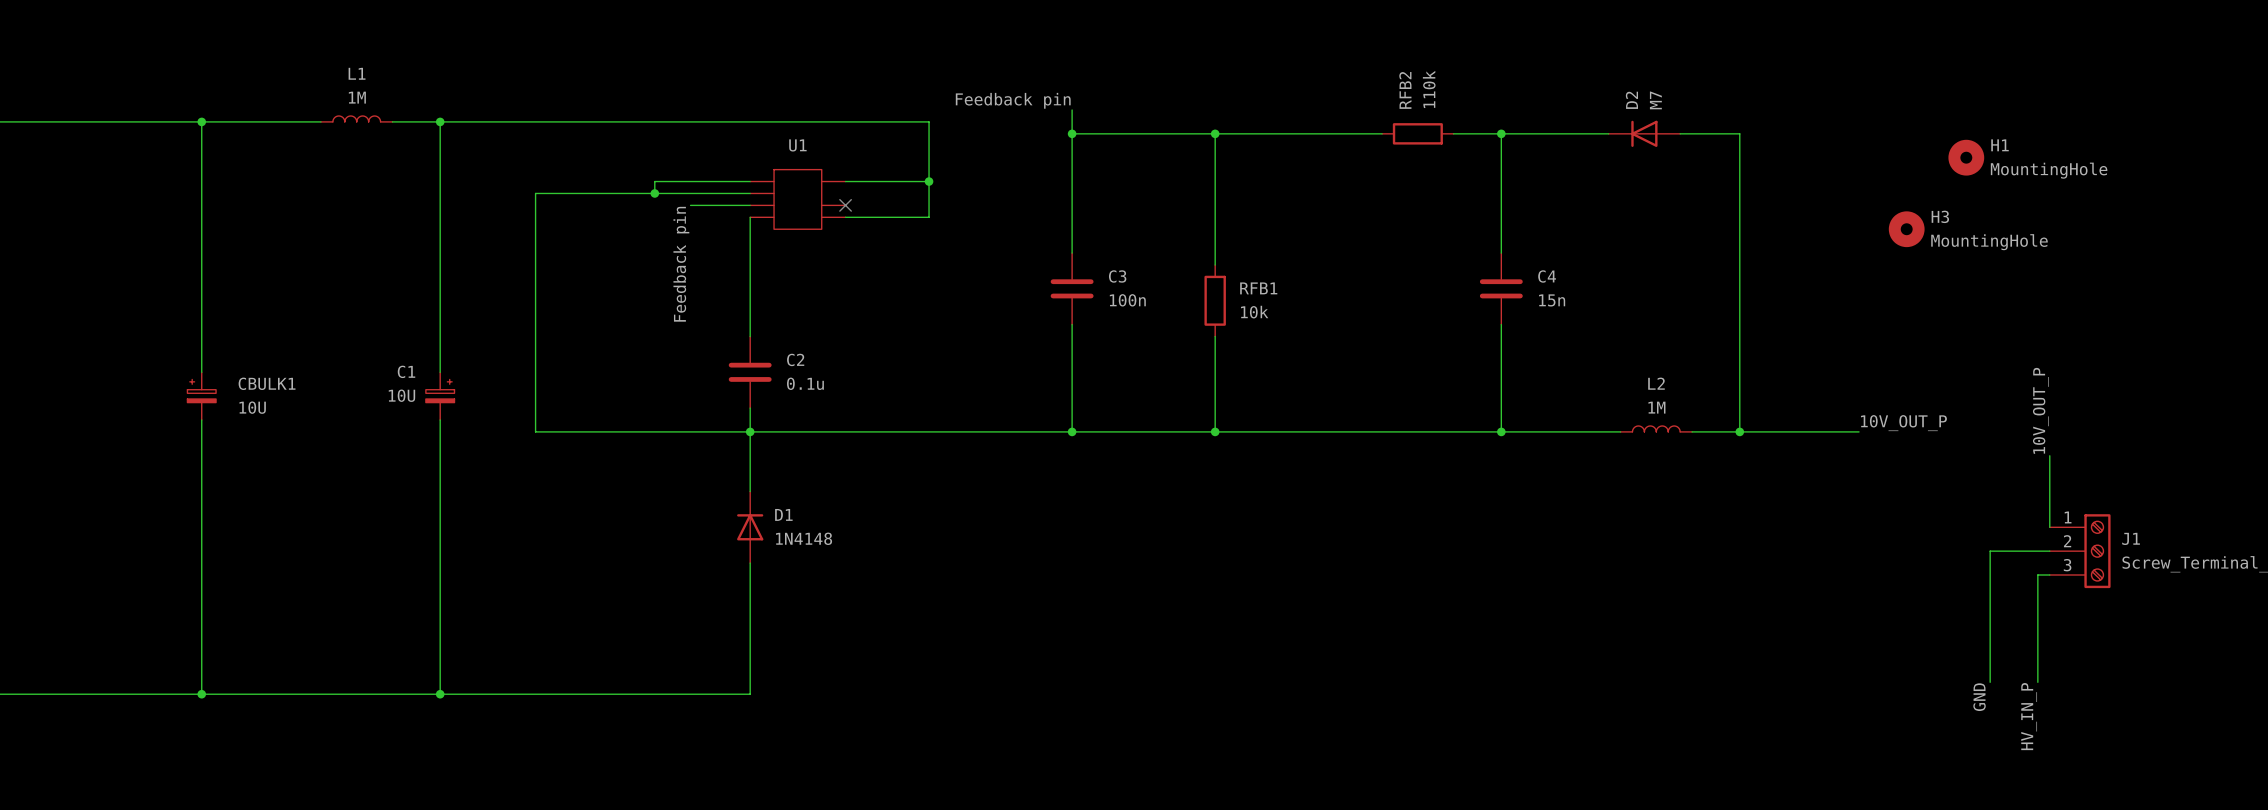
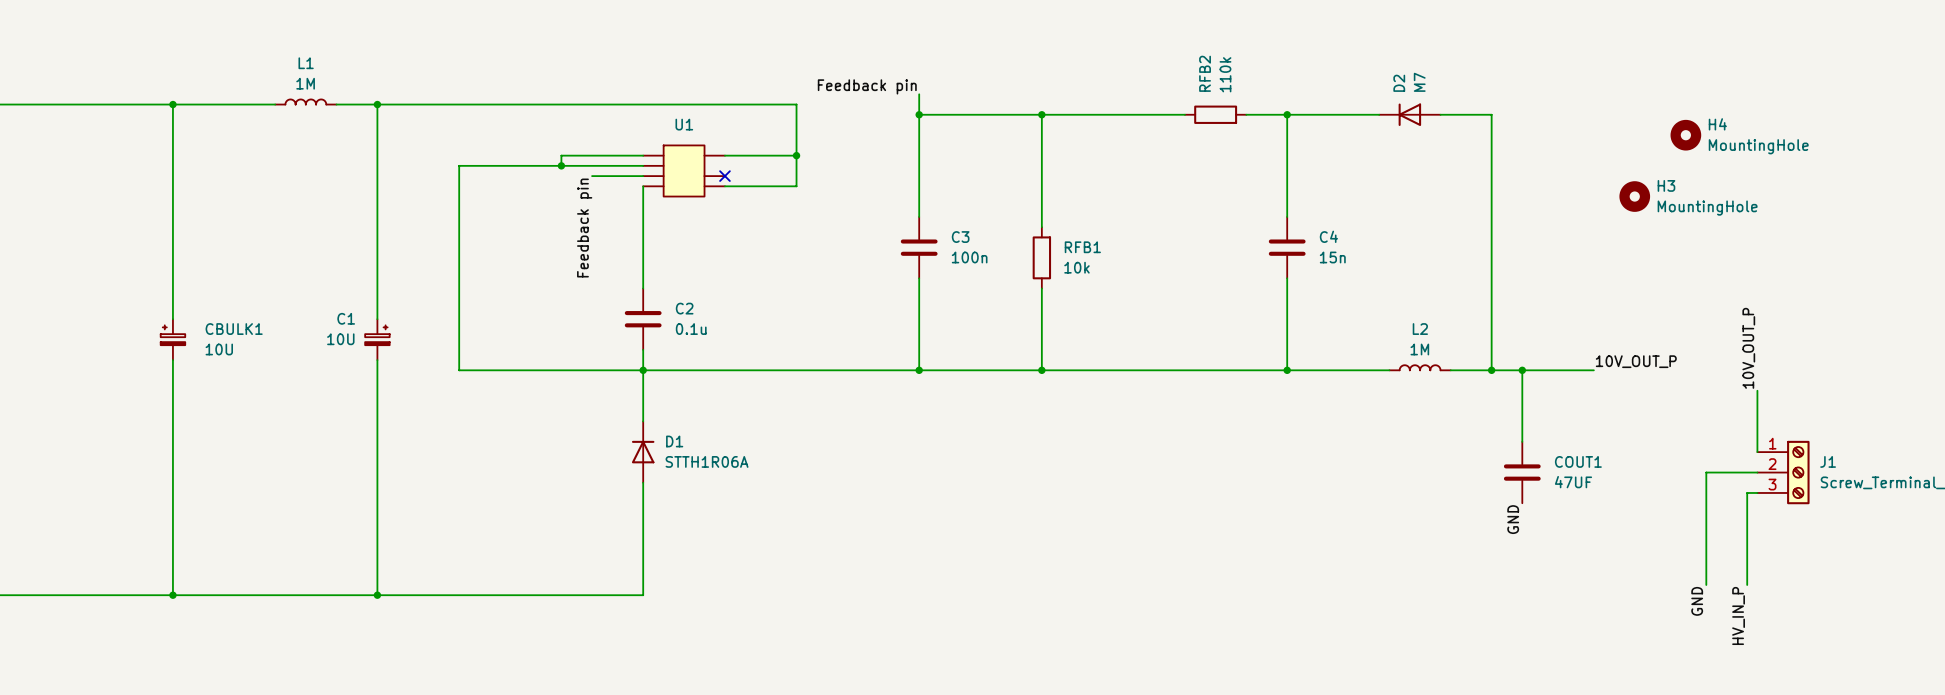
H1 name: H1 (2000, 145) -> H4 (1717, 124)
wire: none -> (1522, 370) (1522, 441)
junction: none -> (1522, 370)
D1 value: 1N4148 (804, 538) -> STTH1R06A (707, 461)
COUT1: none -> 47UF (1522, 472)
label: none -> GND (1513, 519)

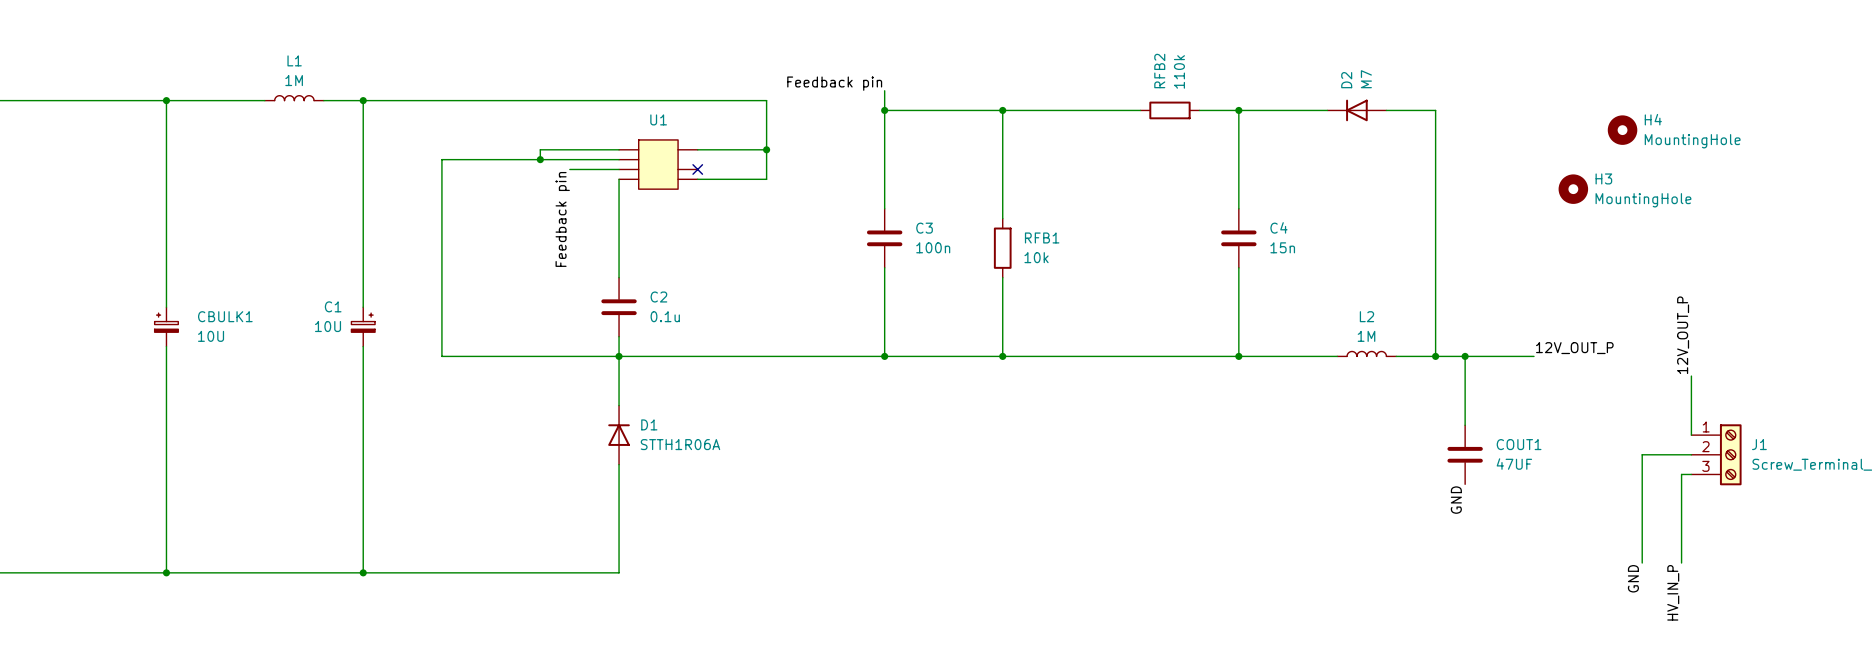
label: 10V_OUT_P (1748, 348) -> 12V_OUT_P (1683, 335)
label: 10V_OUT_P (1636, 361) -> 12V_OUT_P (1574, 348)

